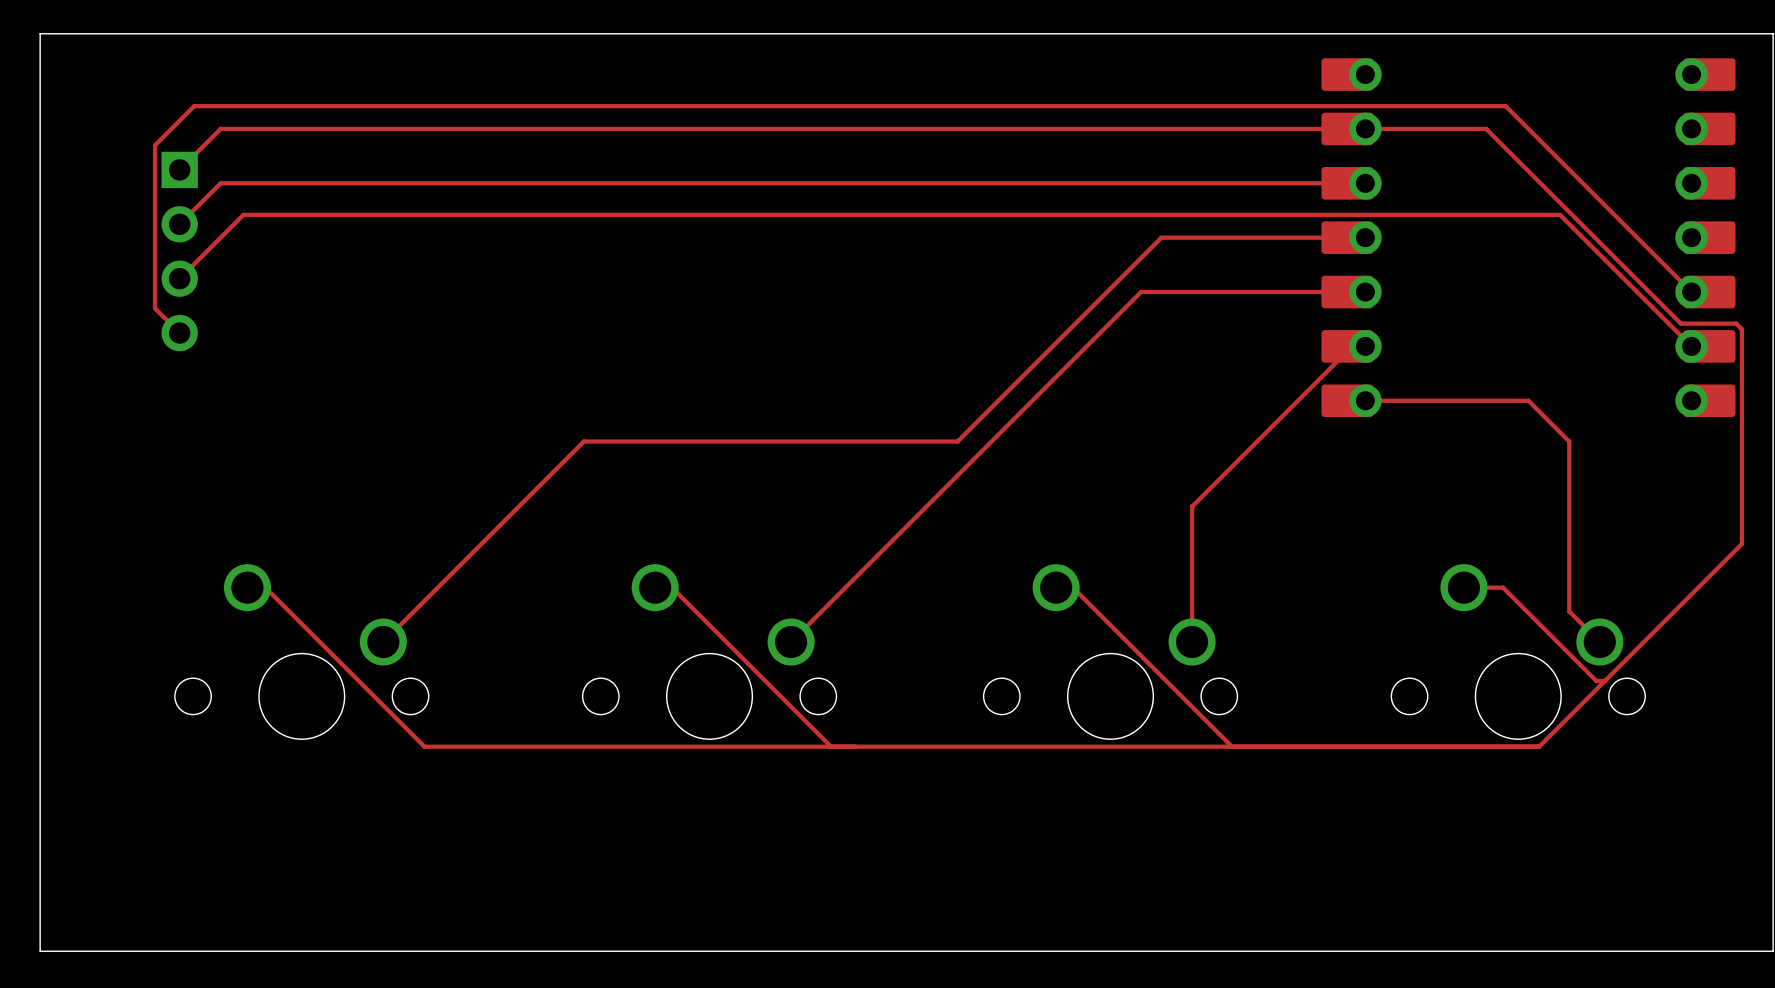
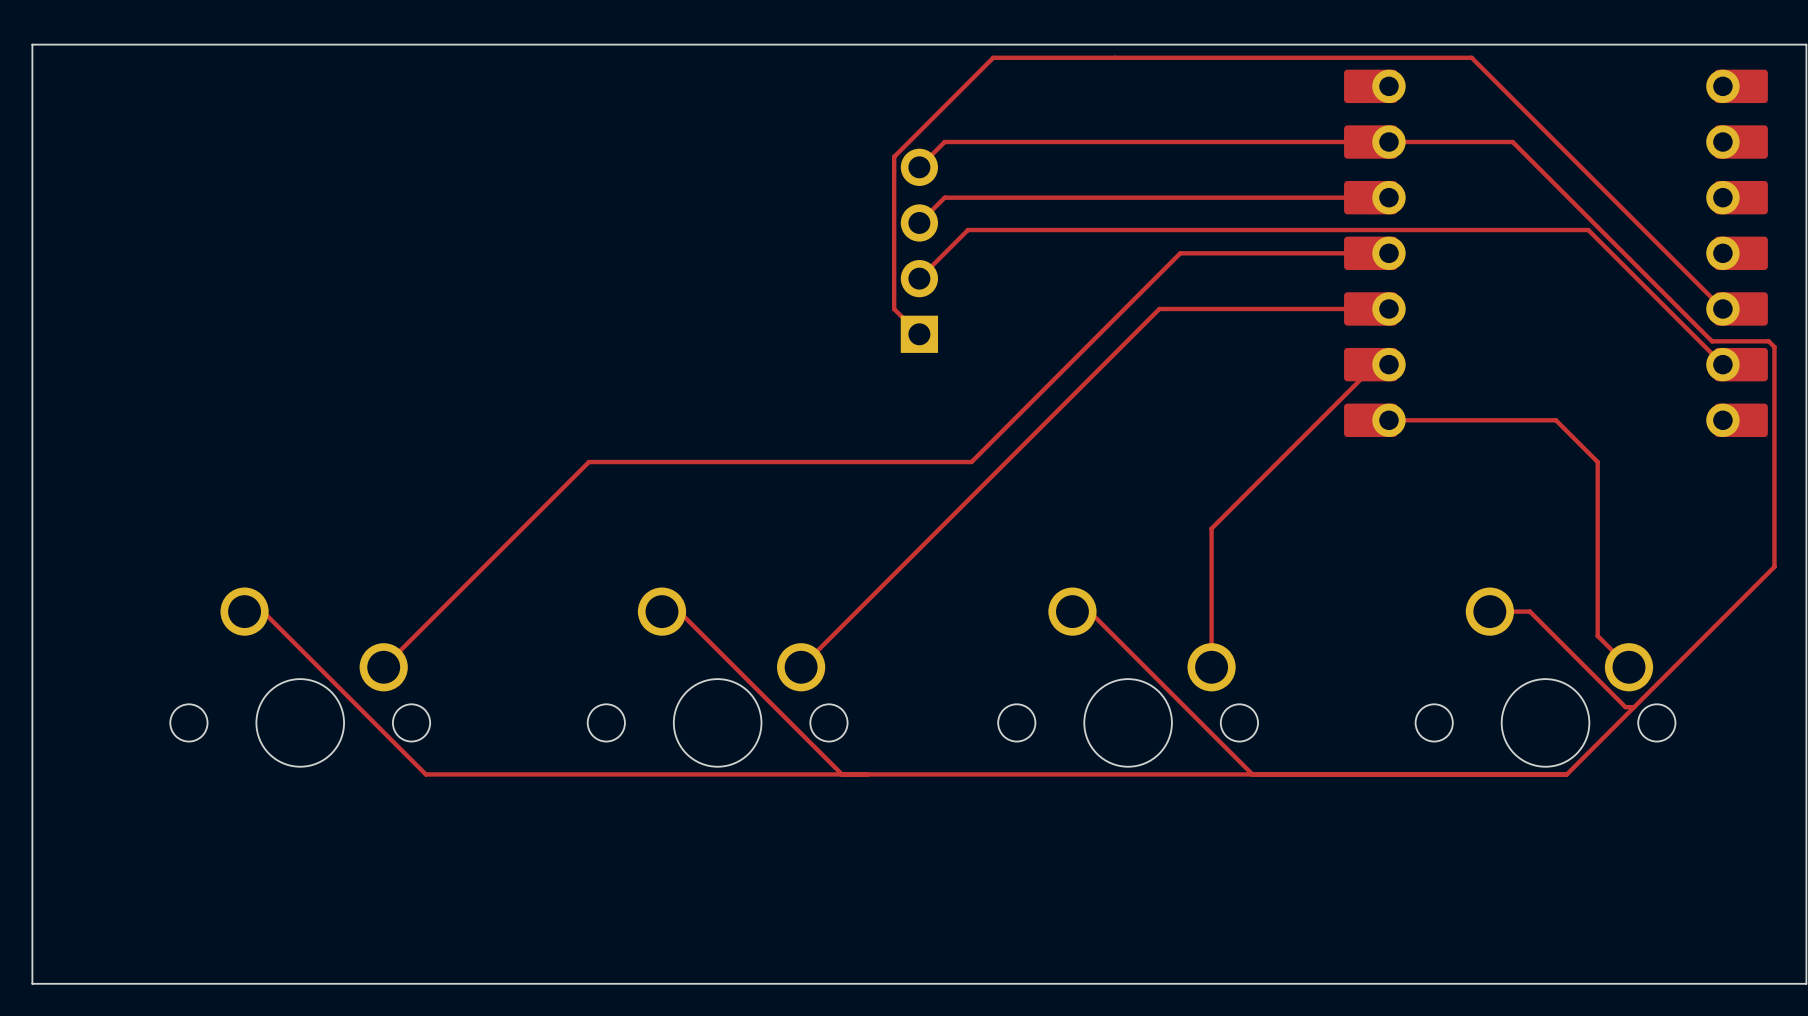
top track: (1505, 106) (194, 106) (155, 145) (155, 308) (179, 333) -> (1532, 118) (1471, 57) (993, 57) (894, 156) (894, 309) (919, 334)
top track: (931, 128) (220, 128) (179, 169) -> (944, 142) (919, 167)
top track: (931, 183) (220, 183) (179, 224) -> (944, 197) (919, 222)
top track: (954, 214) (243, 214) (179, 278) -> (968, 230) (919, 278)
part: none -> (919, 250)
part: (179, 251) -> none

